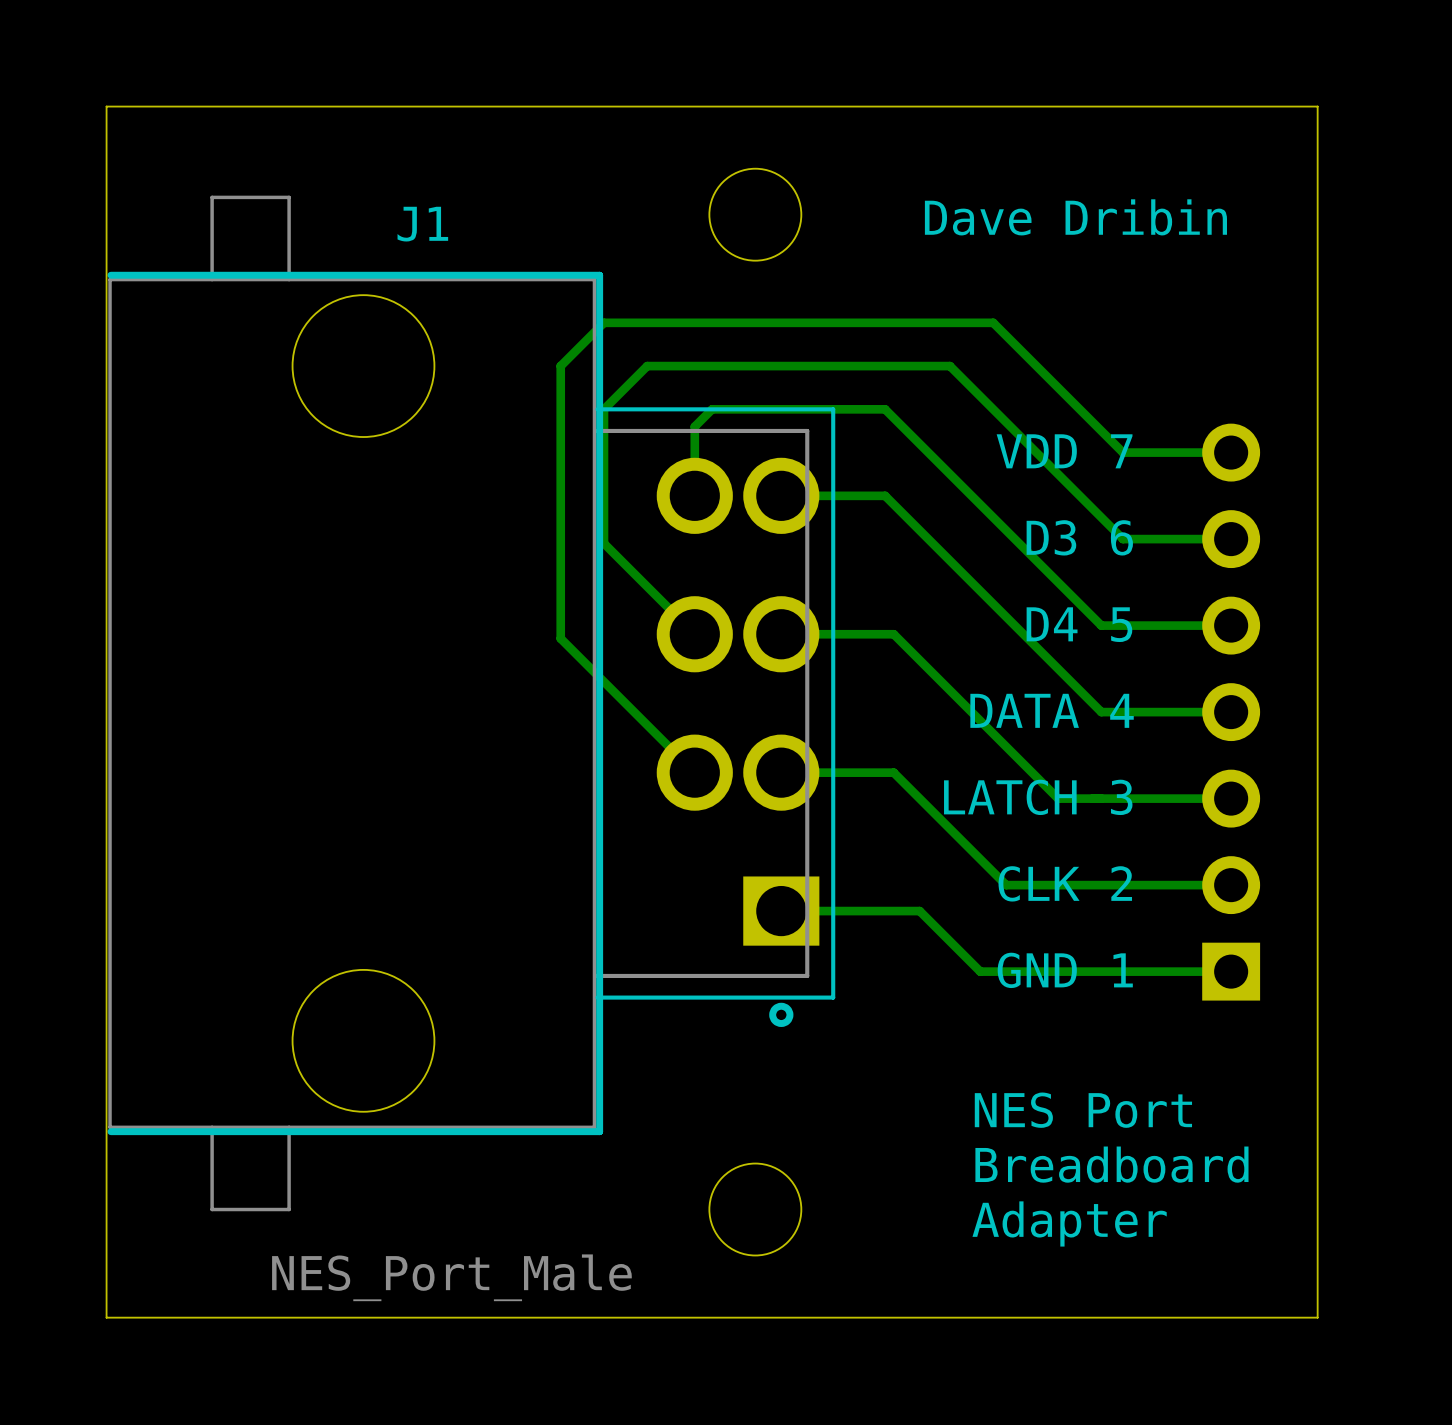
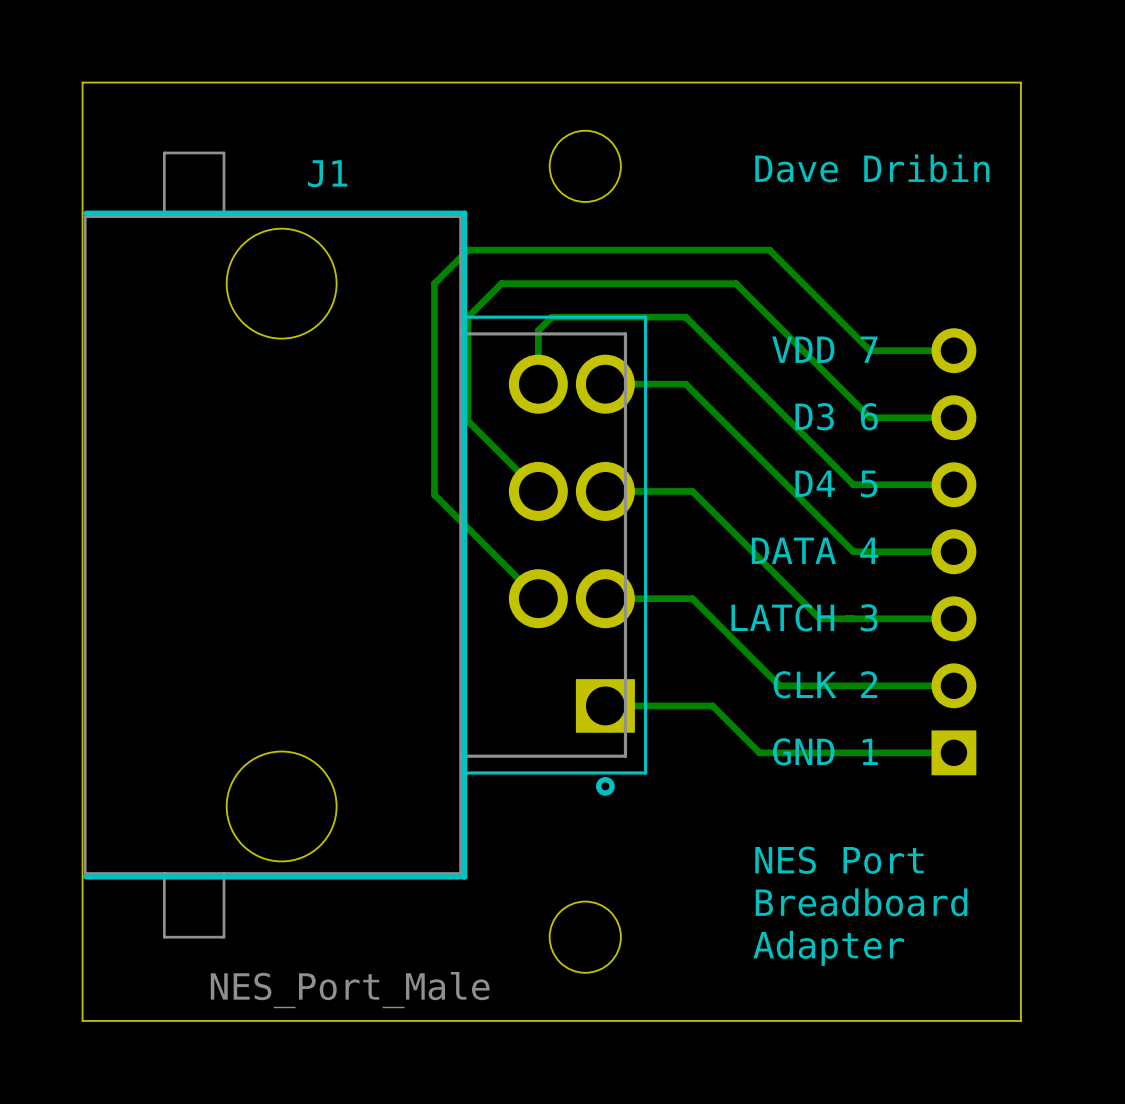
text position: Dave Dribin (1075, 217) -> Dave Dribin (872, 168)

